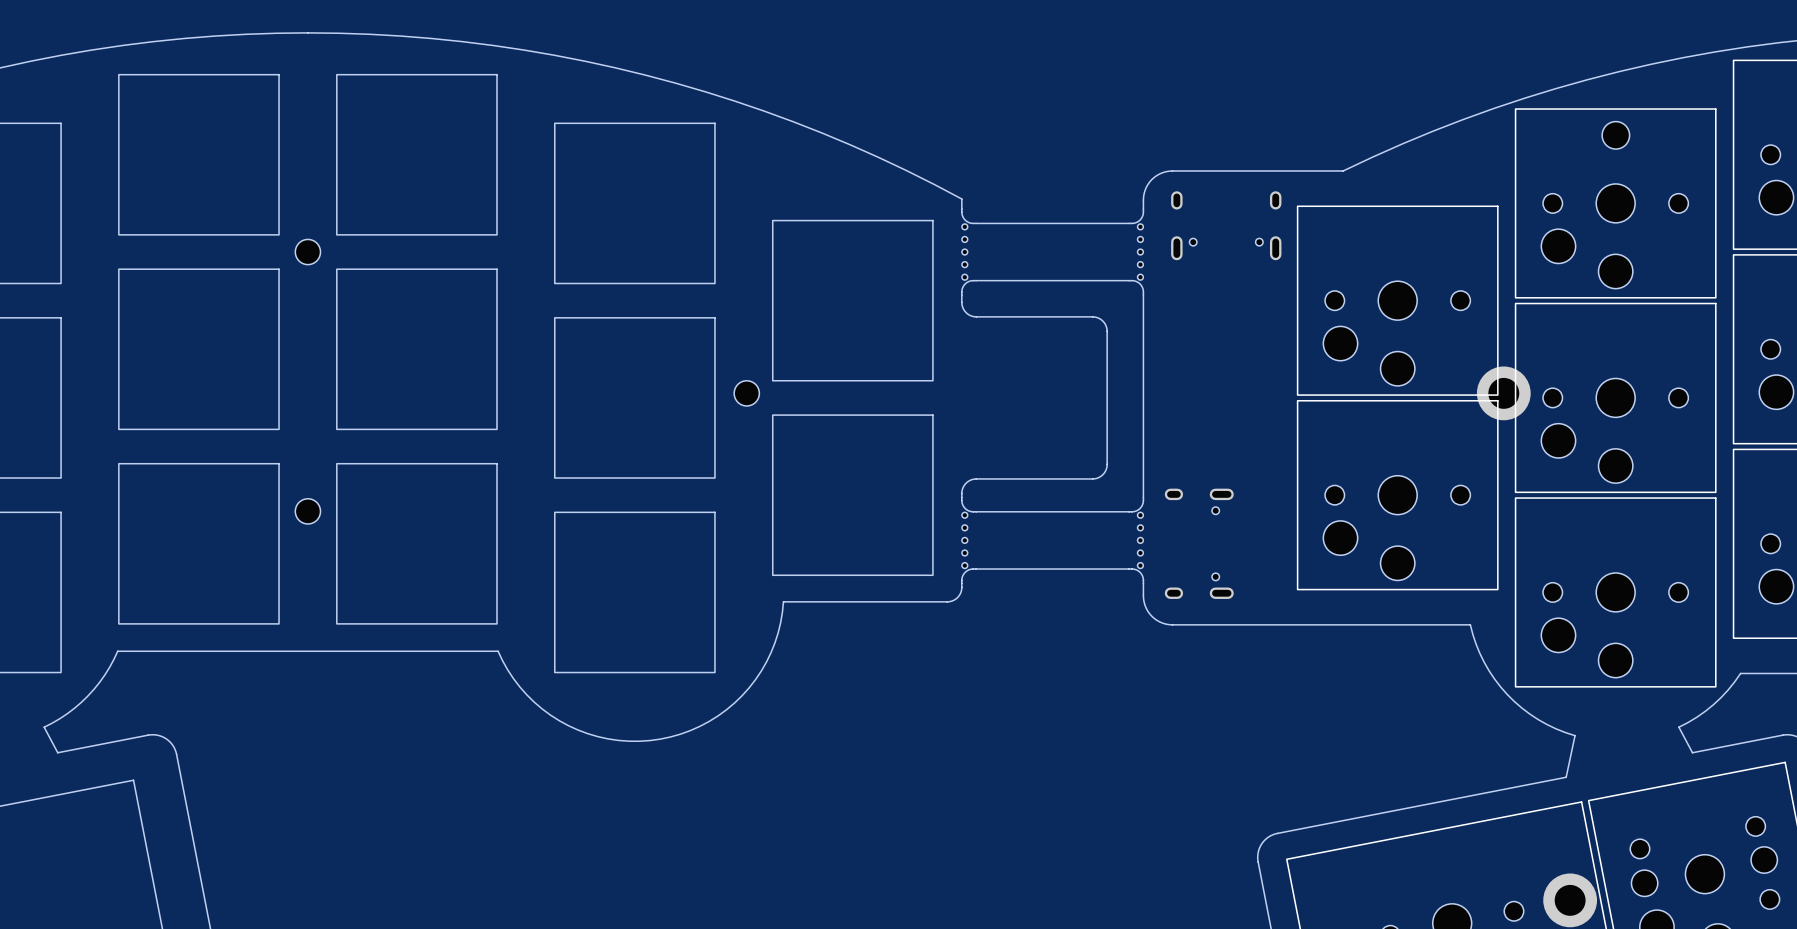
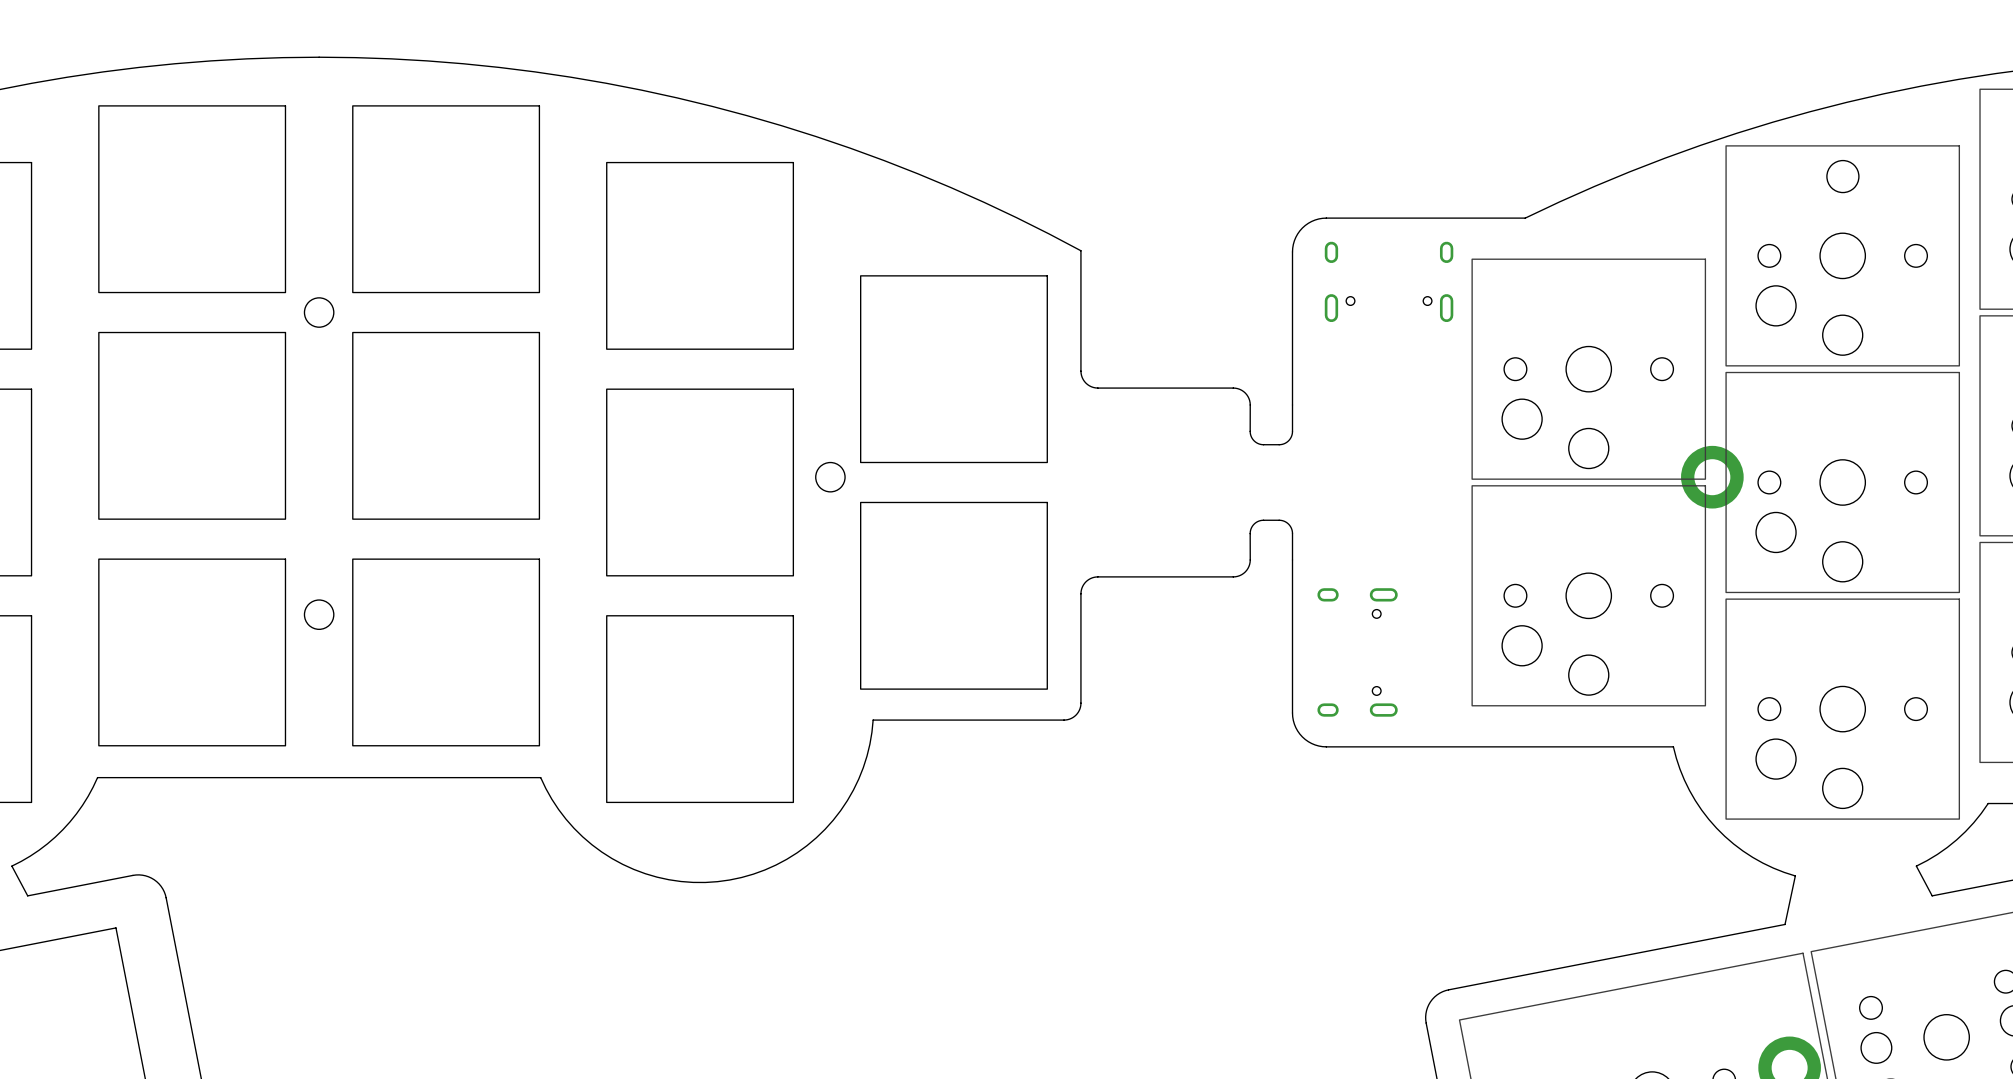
board edge: none -> (1080, 262) (1080, 362)
board edge: none -> (1292, 262) (1292, 362)
board edge: (1129, 223) (976, 223) -> none
part: (968, 252) -> none
part: (1136, 252) -> none
board edge: (1129, 280) (976, 280) -> none
board edge: (1107, 331) (1107, 464) -> (1250, 404) (1250, 432) (1256, 442) (1263, 444) (1283, 443) (1289, 439) (1292, 431)
board edge: (1143, 354) (1143, 441) -> (1250, 559) (1250, 532) (1256, 522) (1263, 520) (1283, 521) (1289, 525) (1292, 533)
board edge: none -> (1080, 598) (1080, 698)
board edge: none -> (1292, 598) (1292, 698)
board edge: (1129, 511) (976, 511) -> none
part: (968, 540) -> none
part: (1136, 540) -> none
board edge: (1129, 569) (976, 569) -> none

